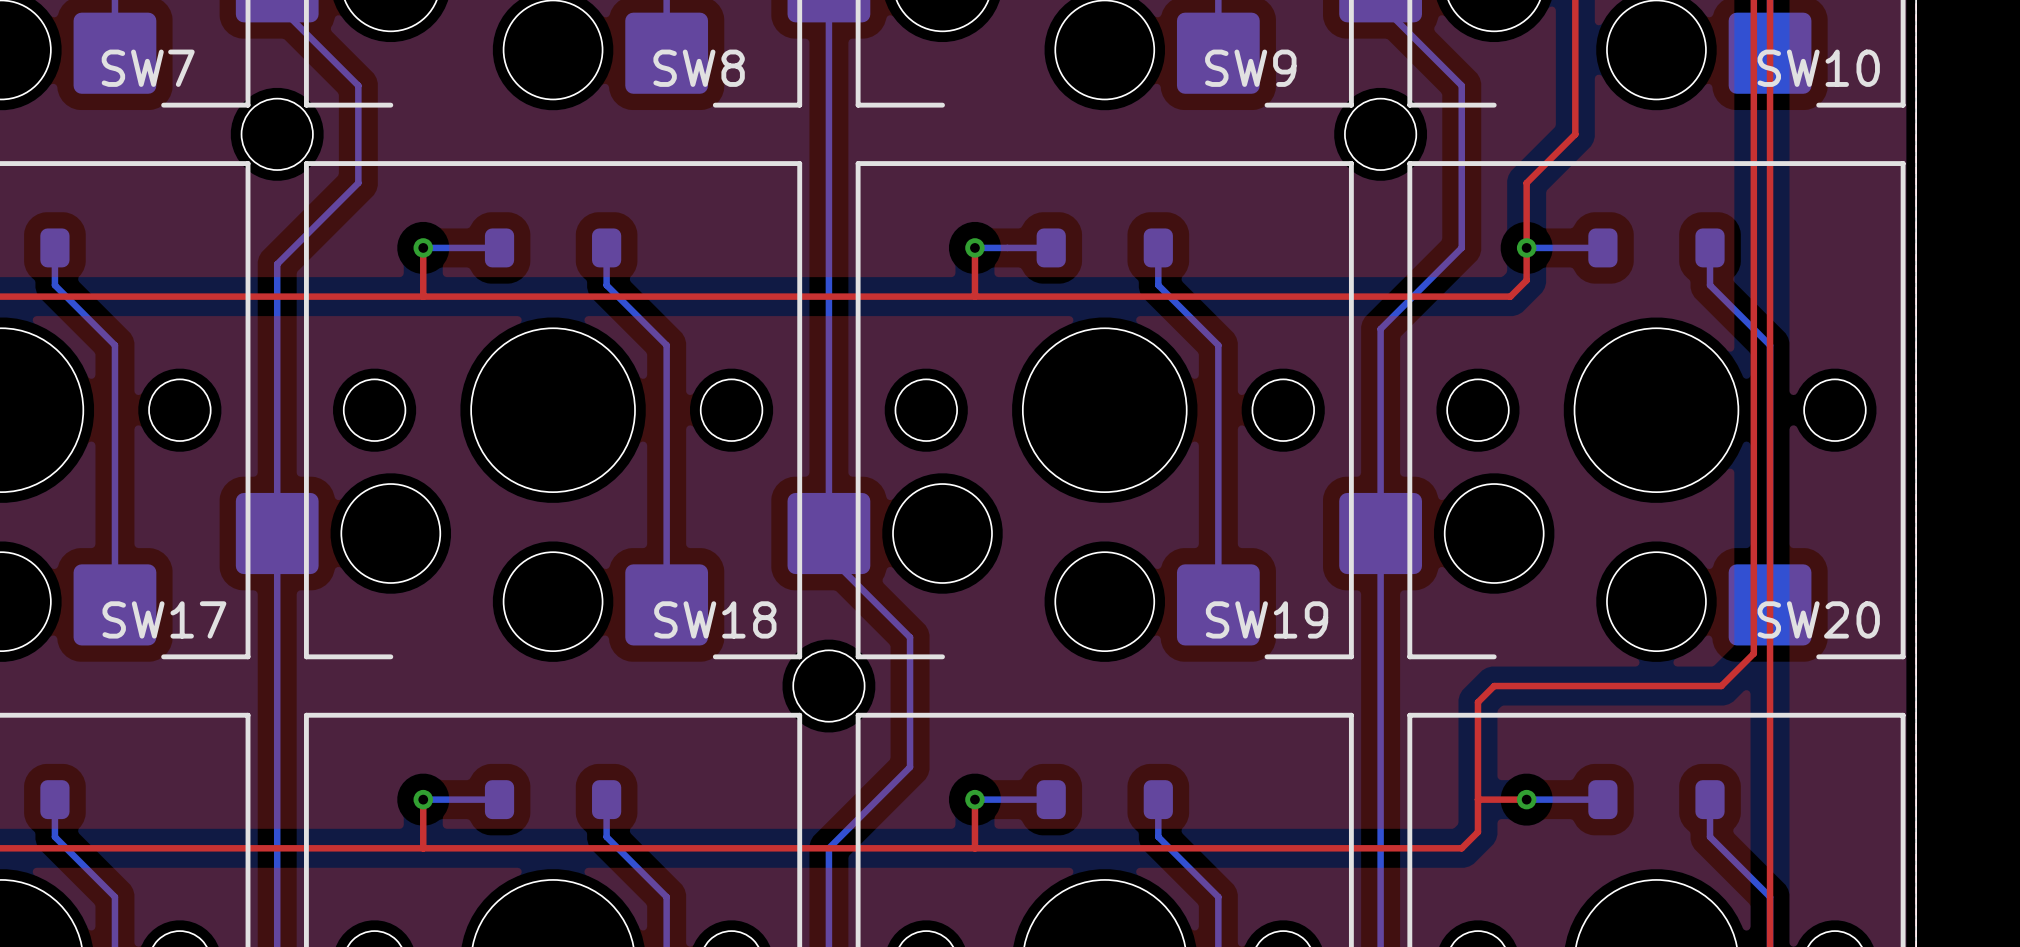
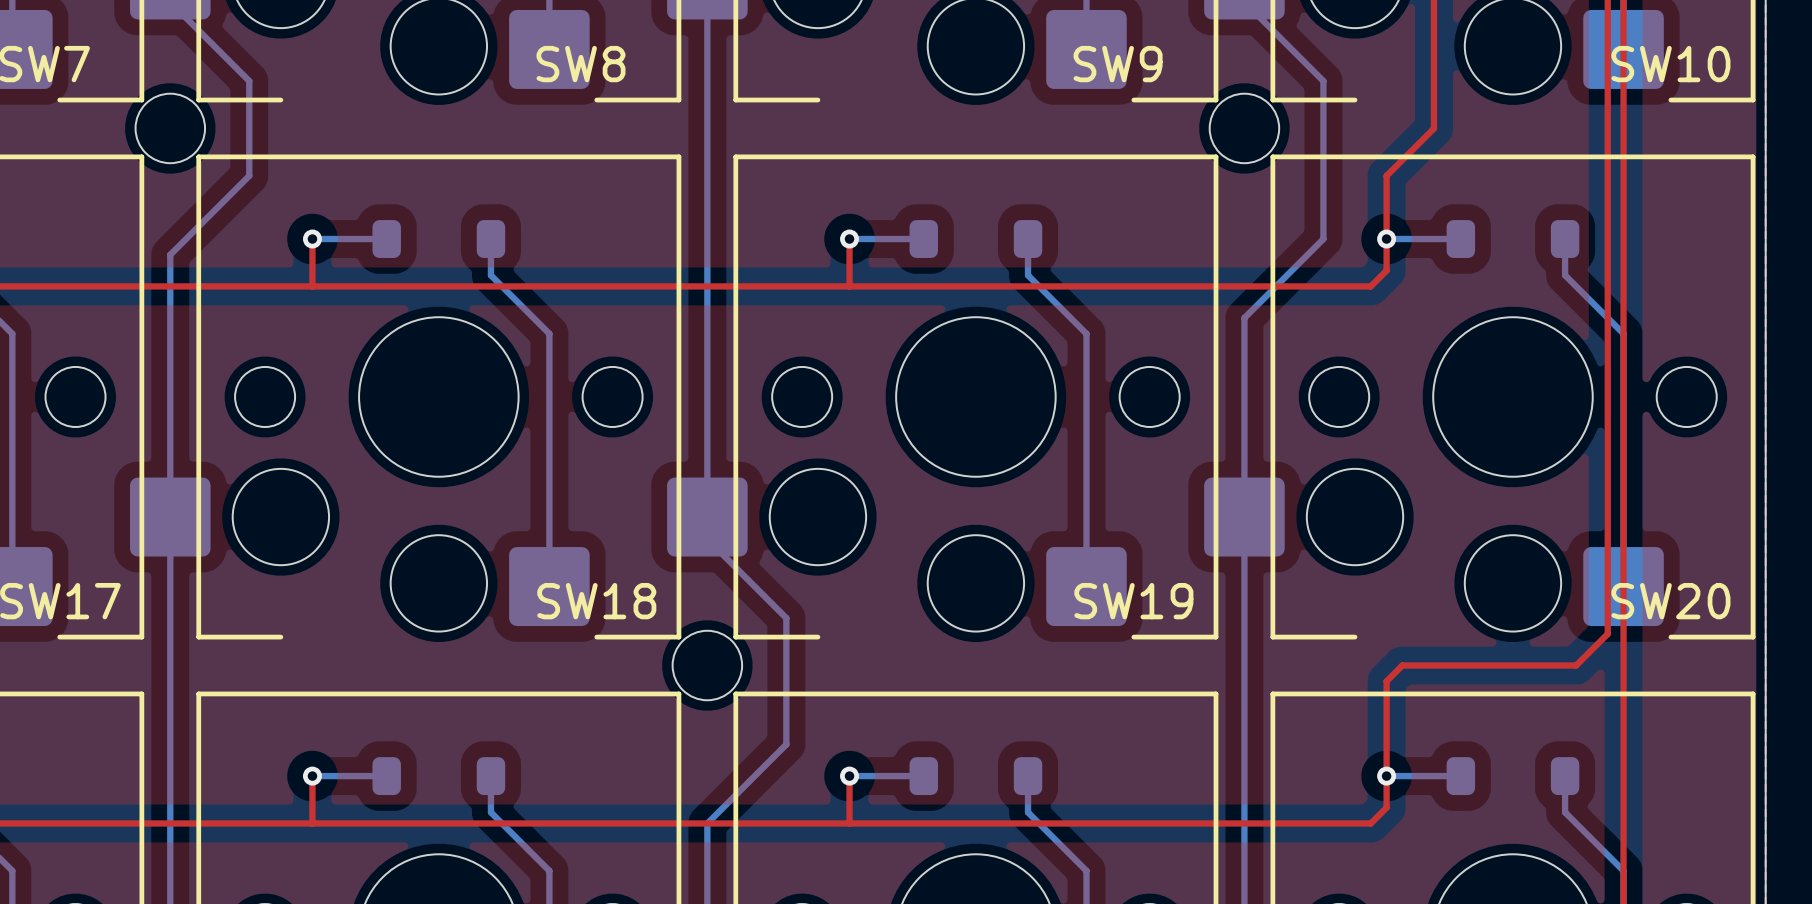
top track: (1542, 686) (1494, 686) (1477, 702) (1477, 832) (1461, 848) -> (1402, 665) (1386, 681) (1386, 807) (1370, 823) (1323, 823)
top track: (1477, 799) (1526, 799) -> none

